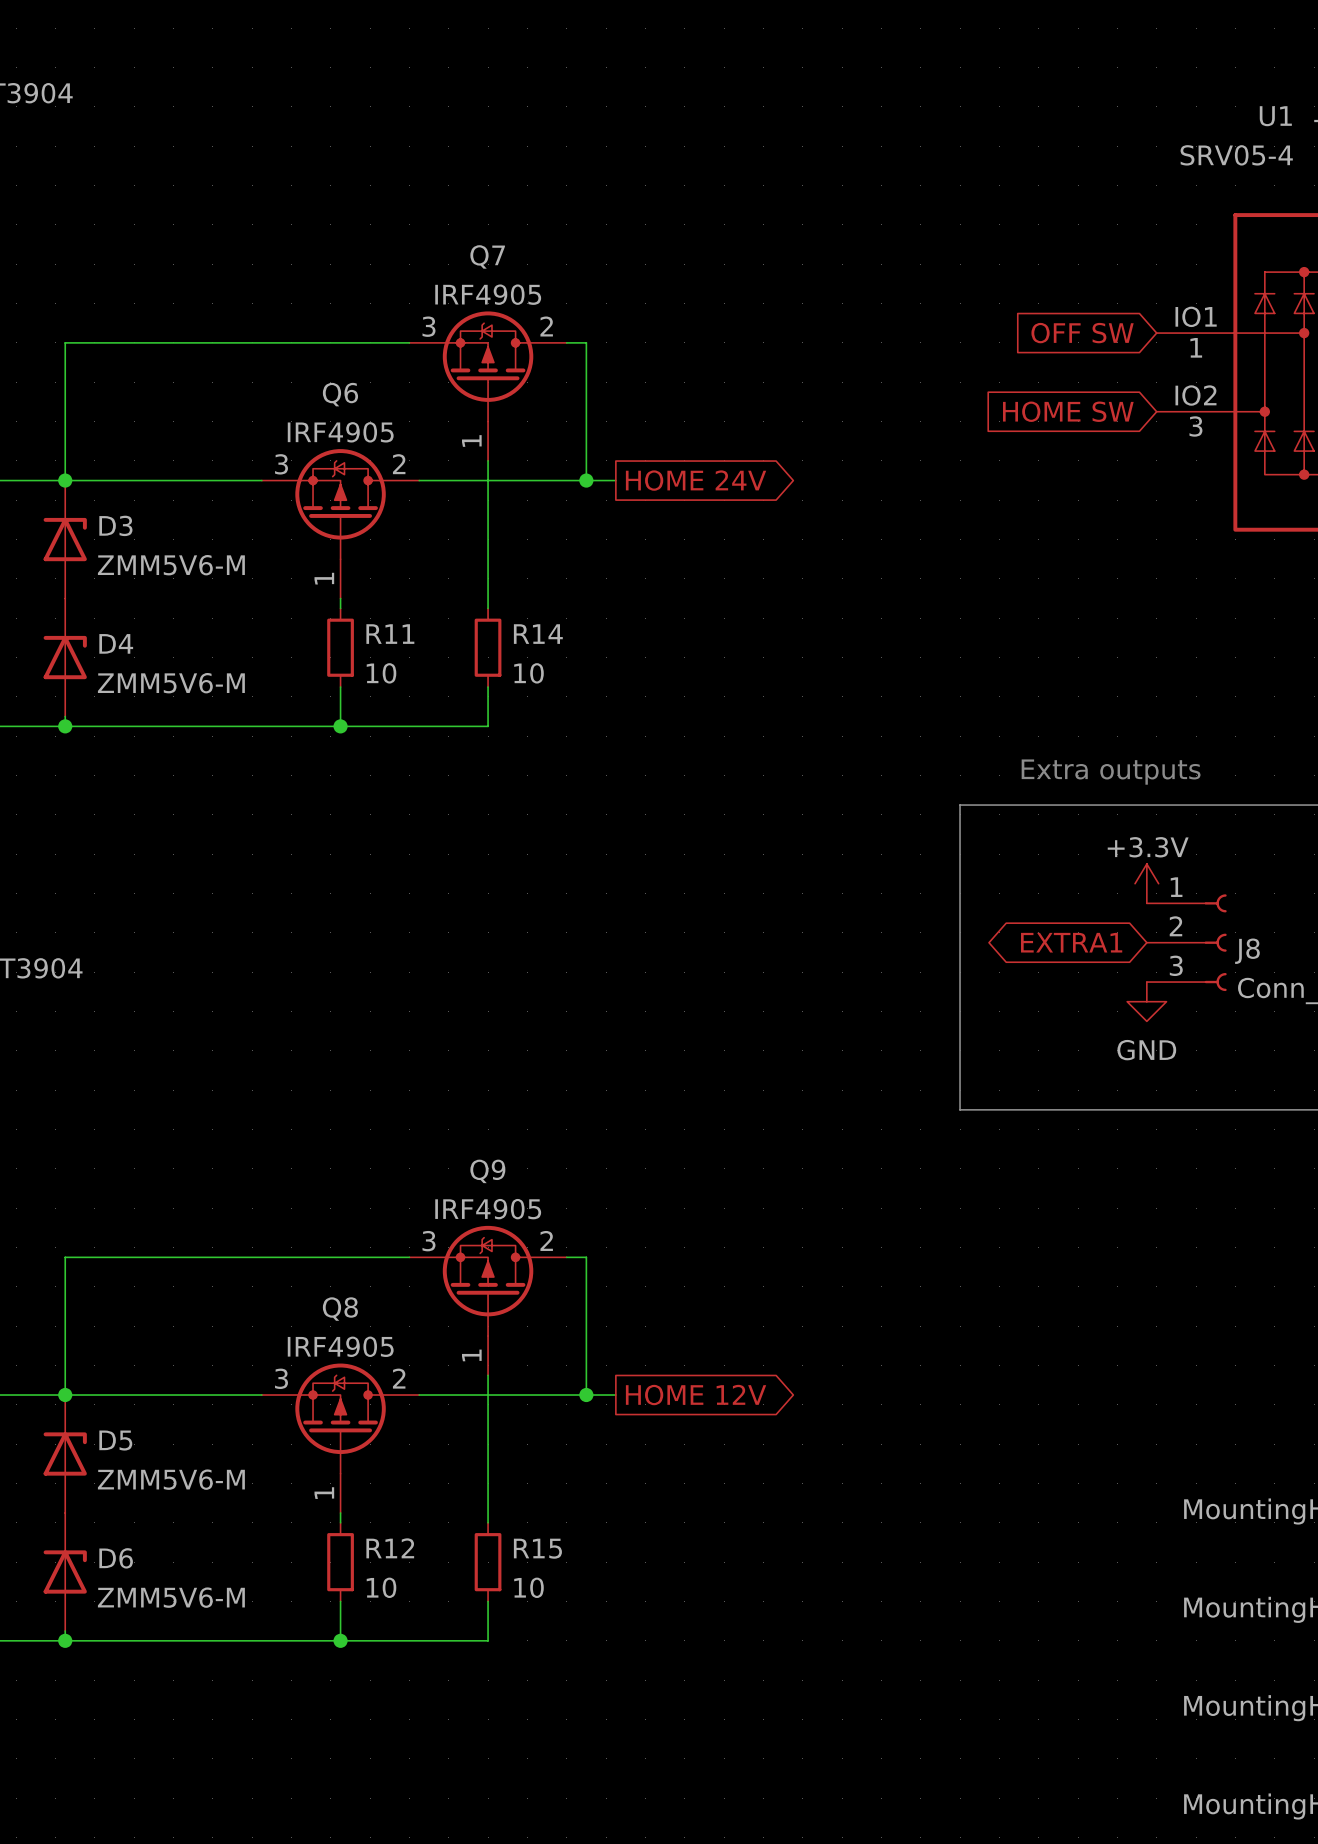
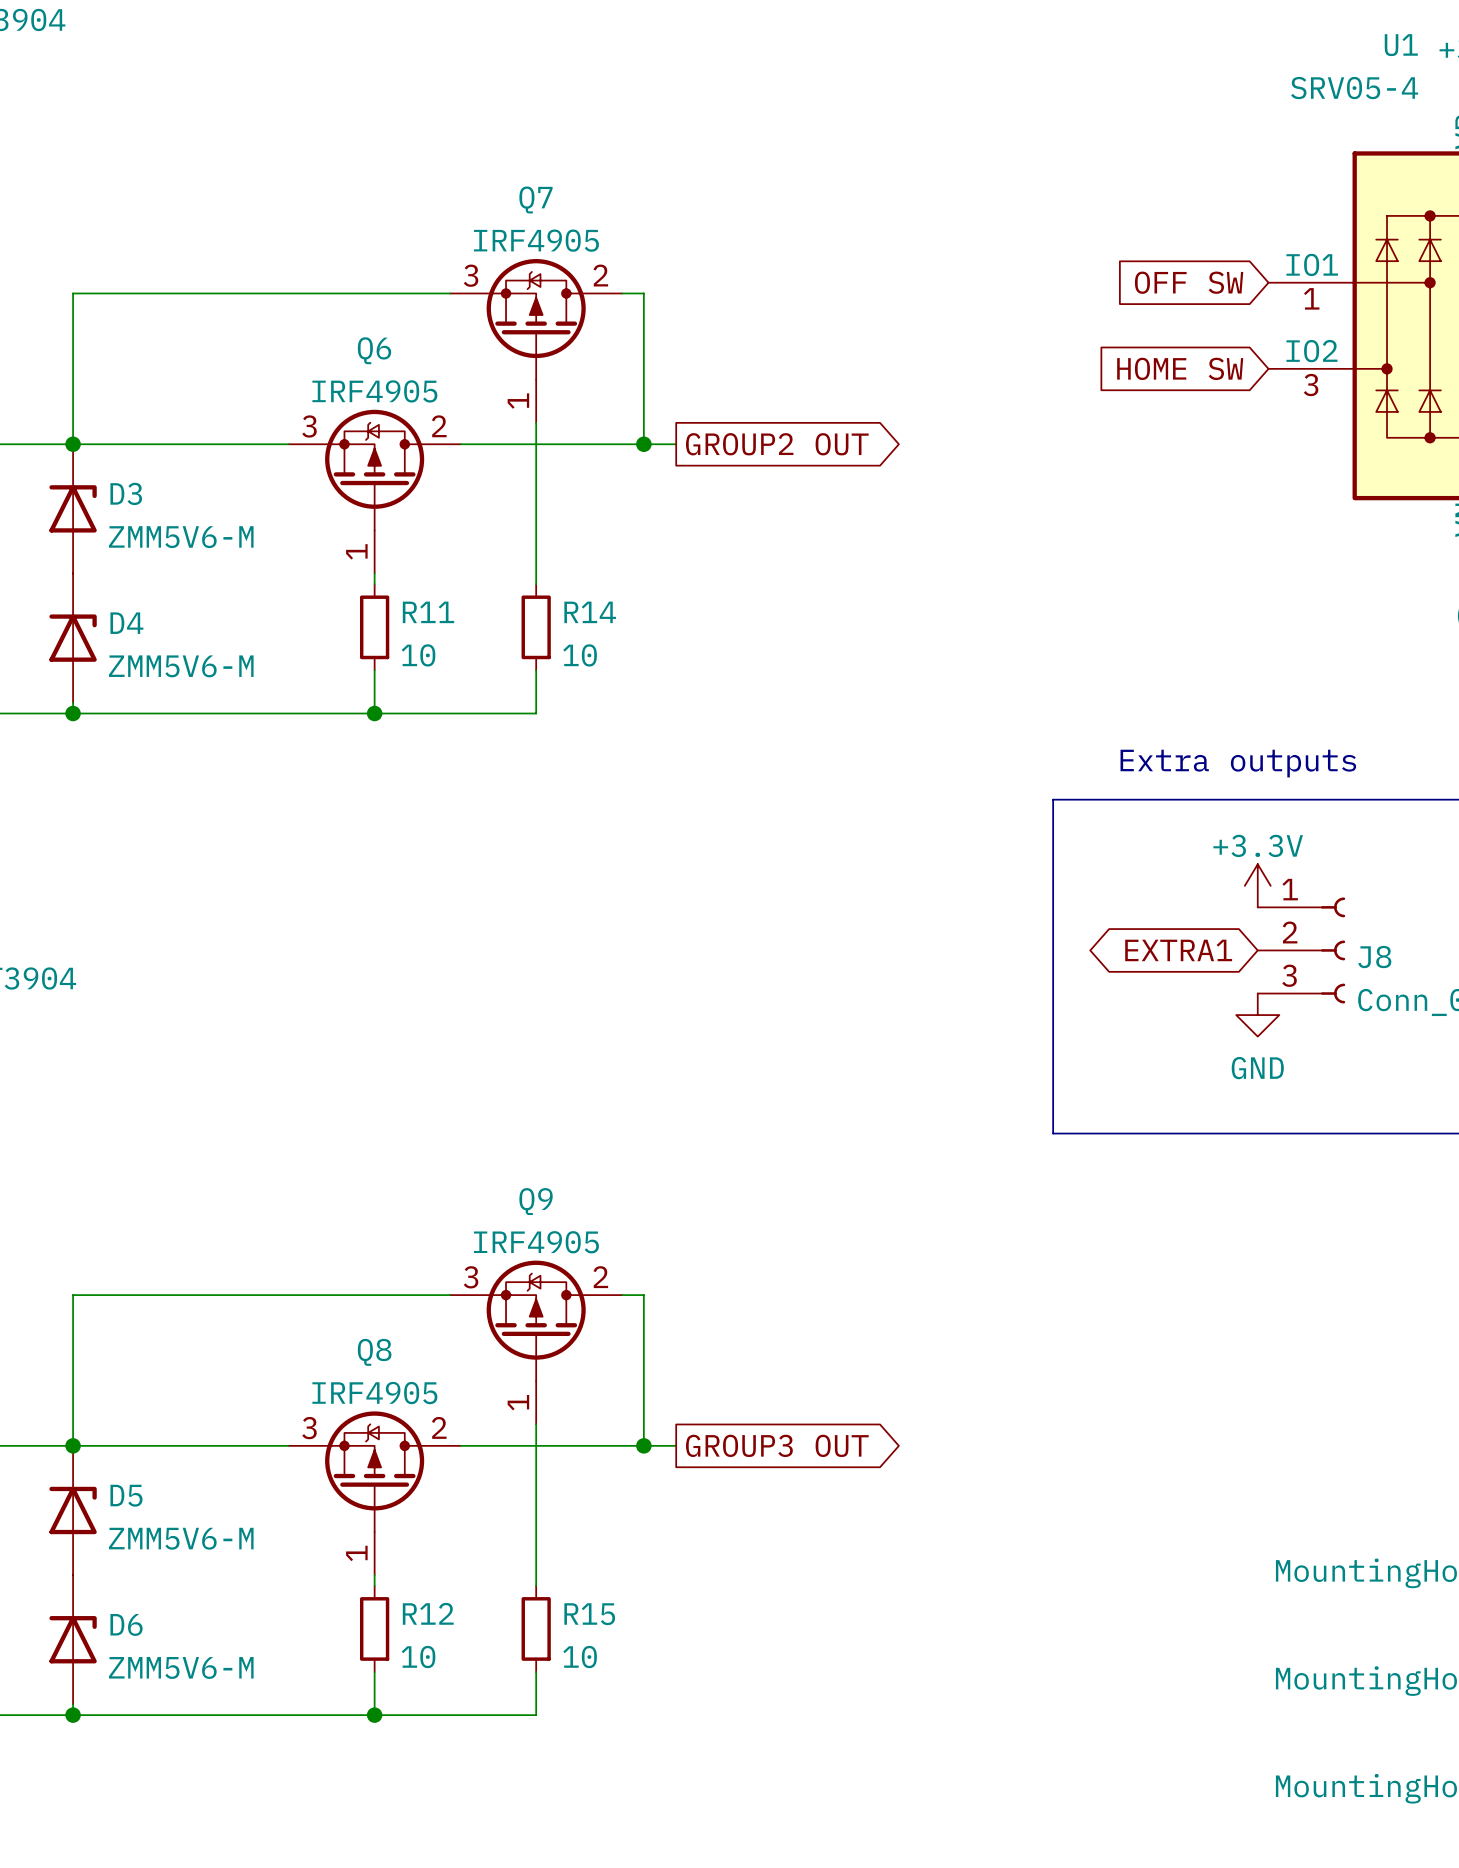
global label: HOME 24V (696, 480) -> GROUP2 OUT (777, 444)
global label: HOME 12V (696, 1395) -> GROUP3 OUT (777, 1445)

